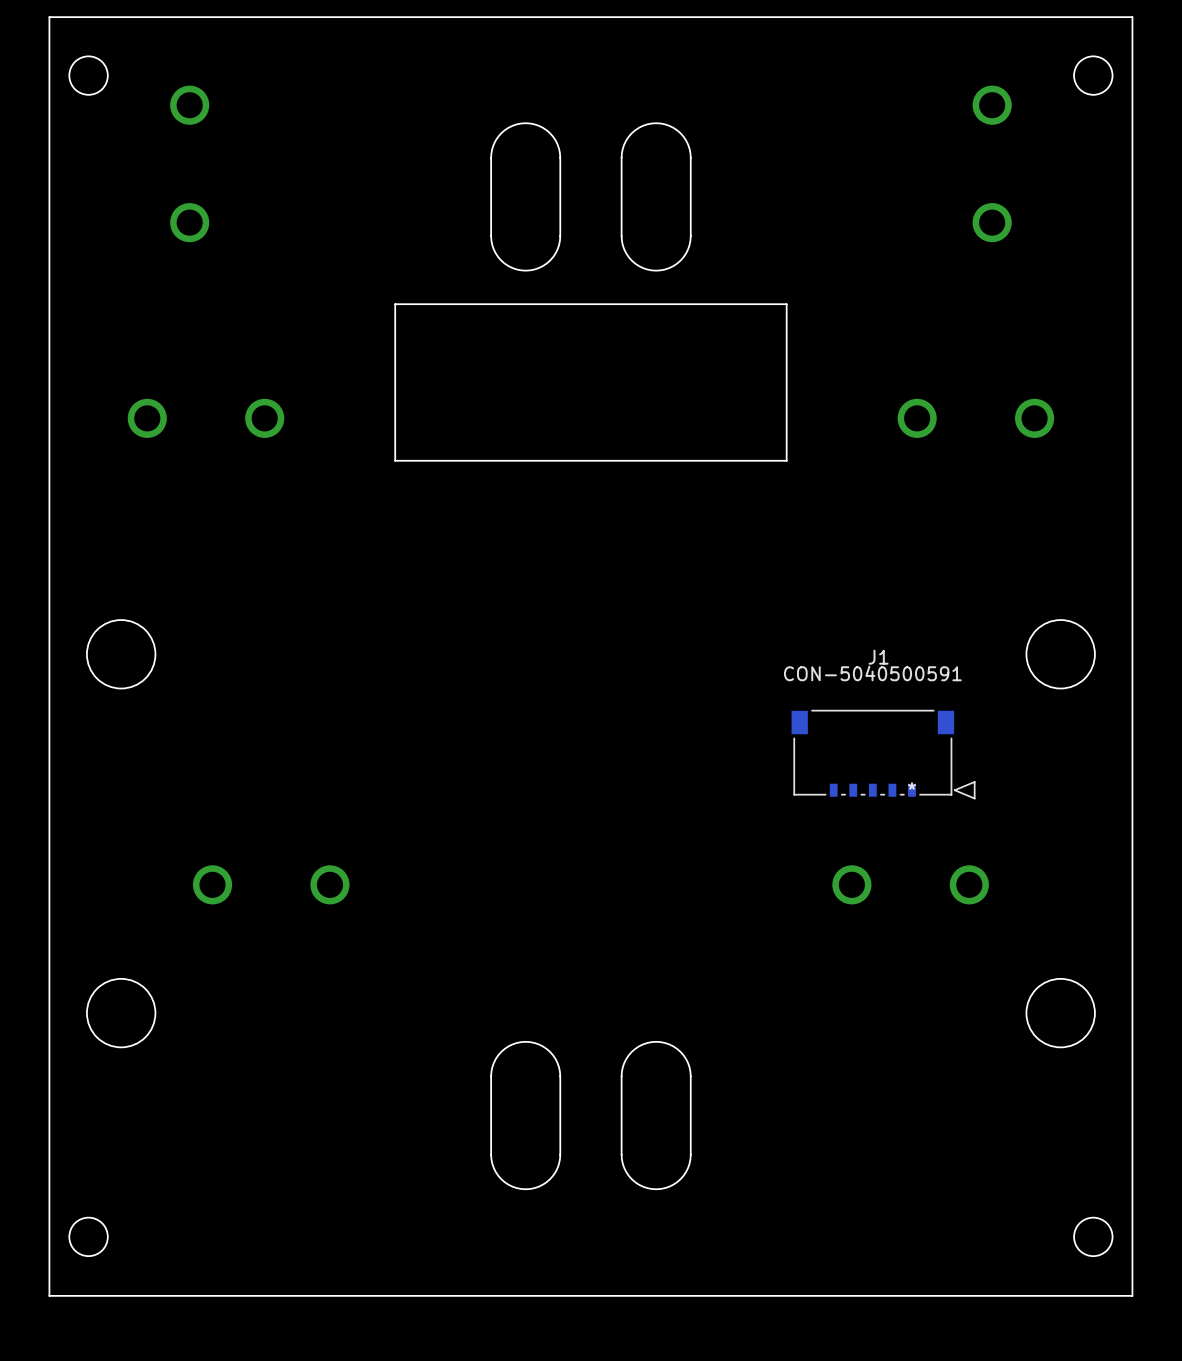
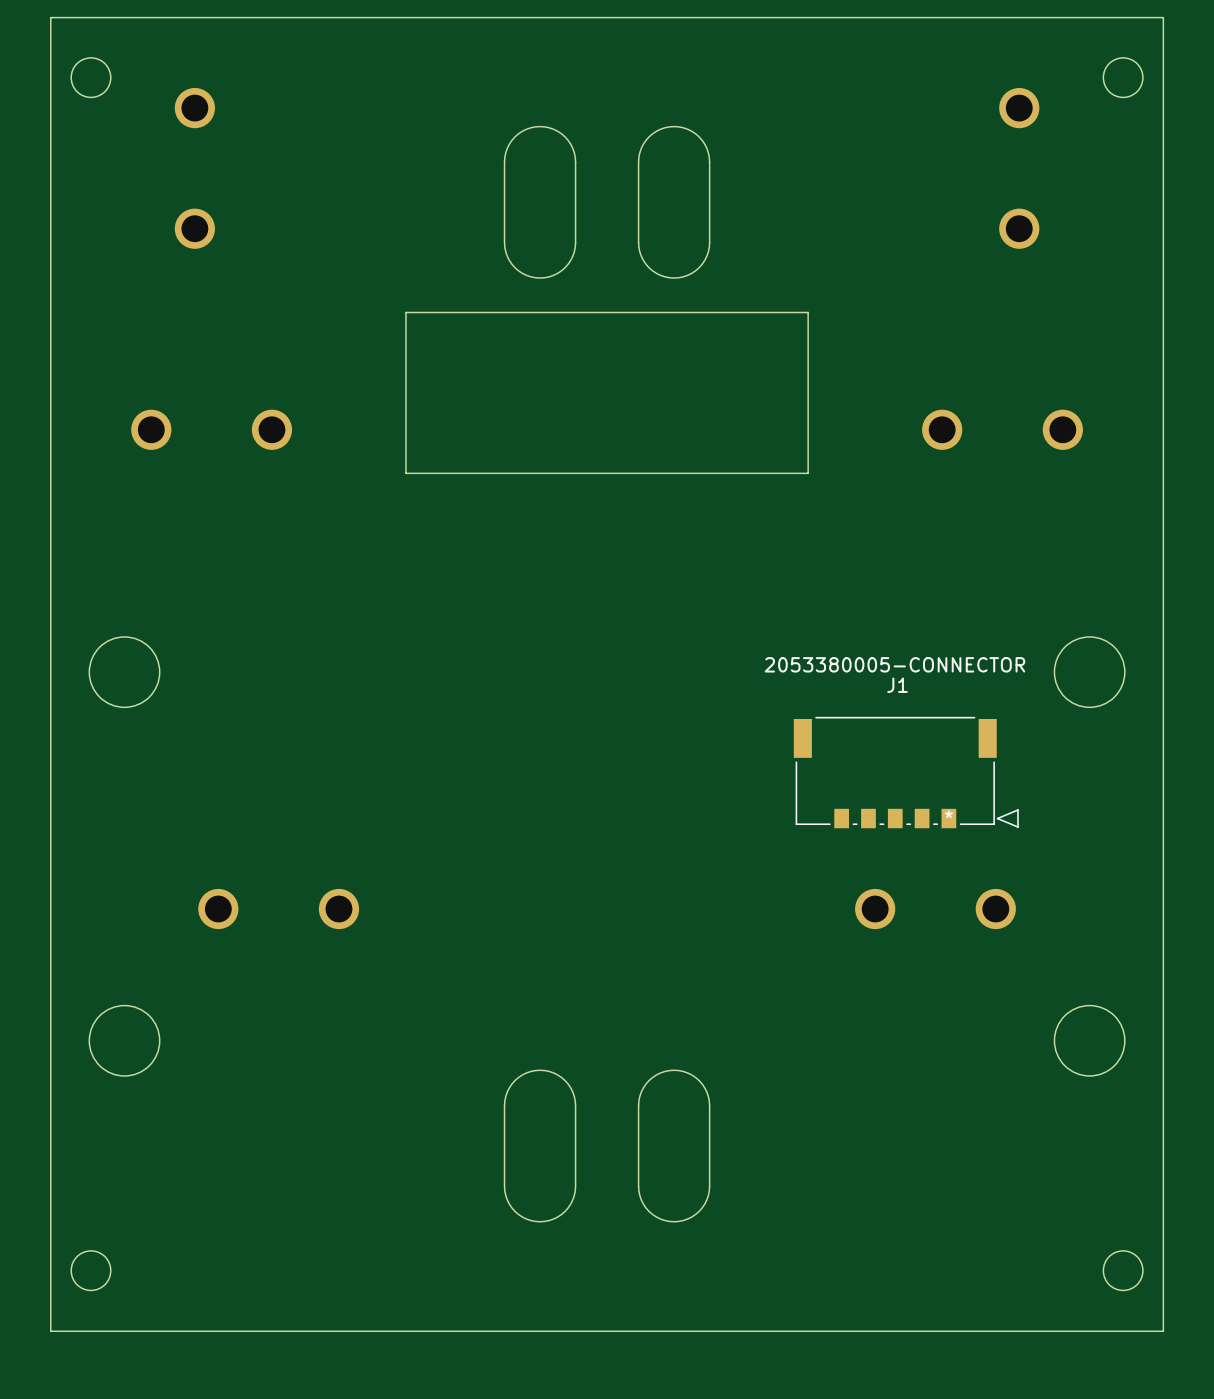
J1 value: CON-5040500591 (872, 673) -> 2053380005-CONNECTOR (894, 664)
J1 footprint: [791, 709, 976, 800] -> [793, 716, 1019, 829]

